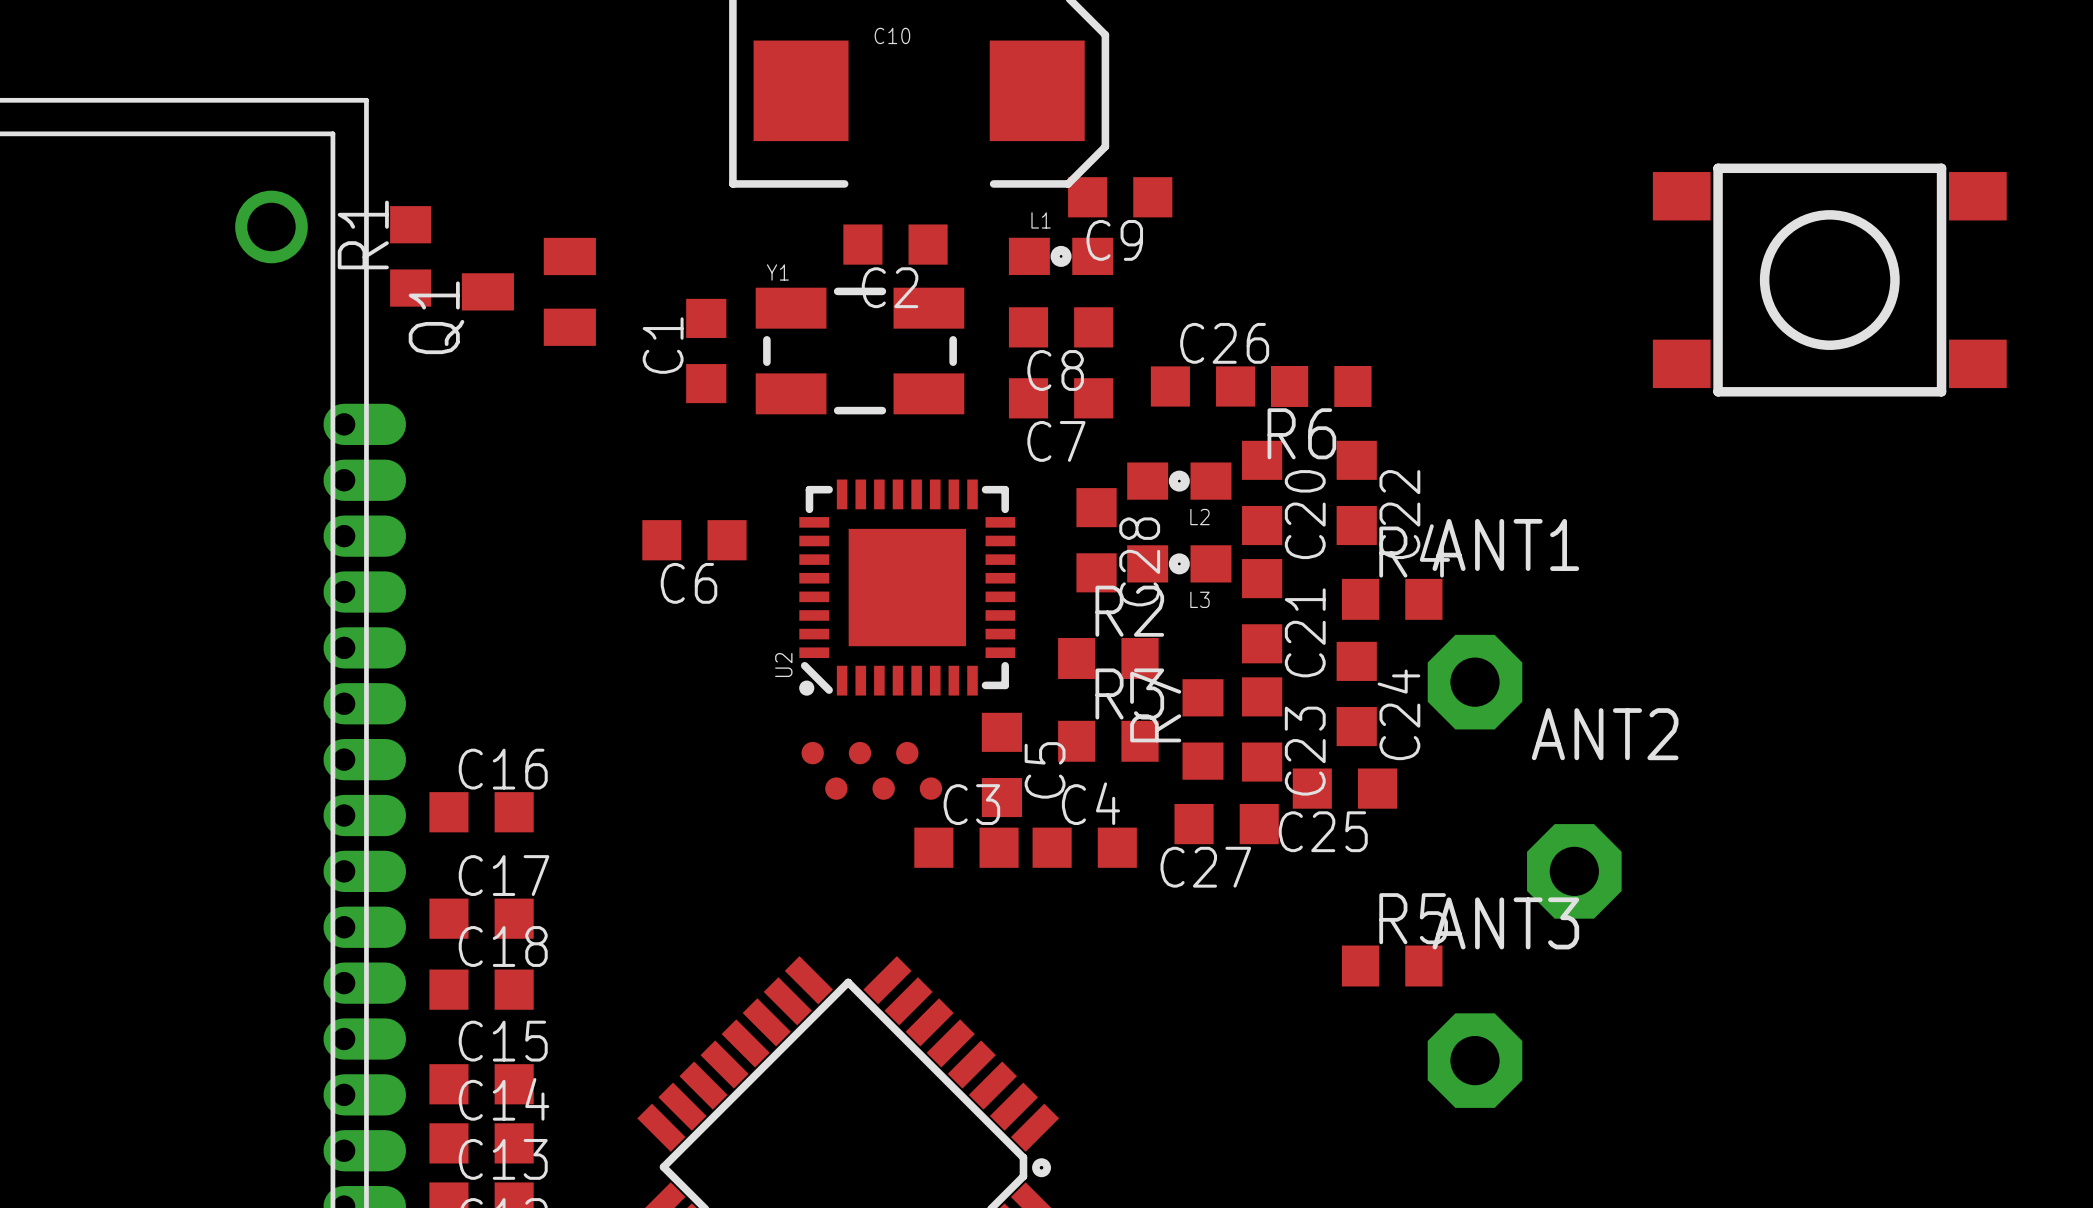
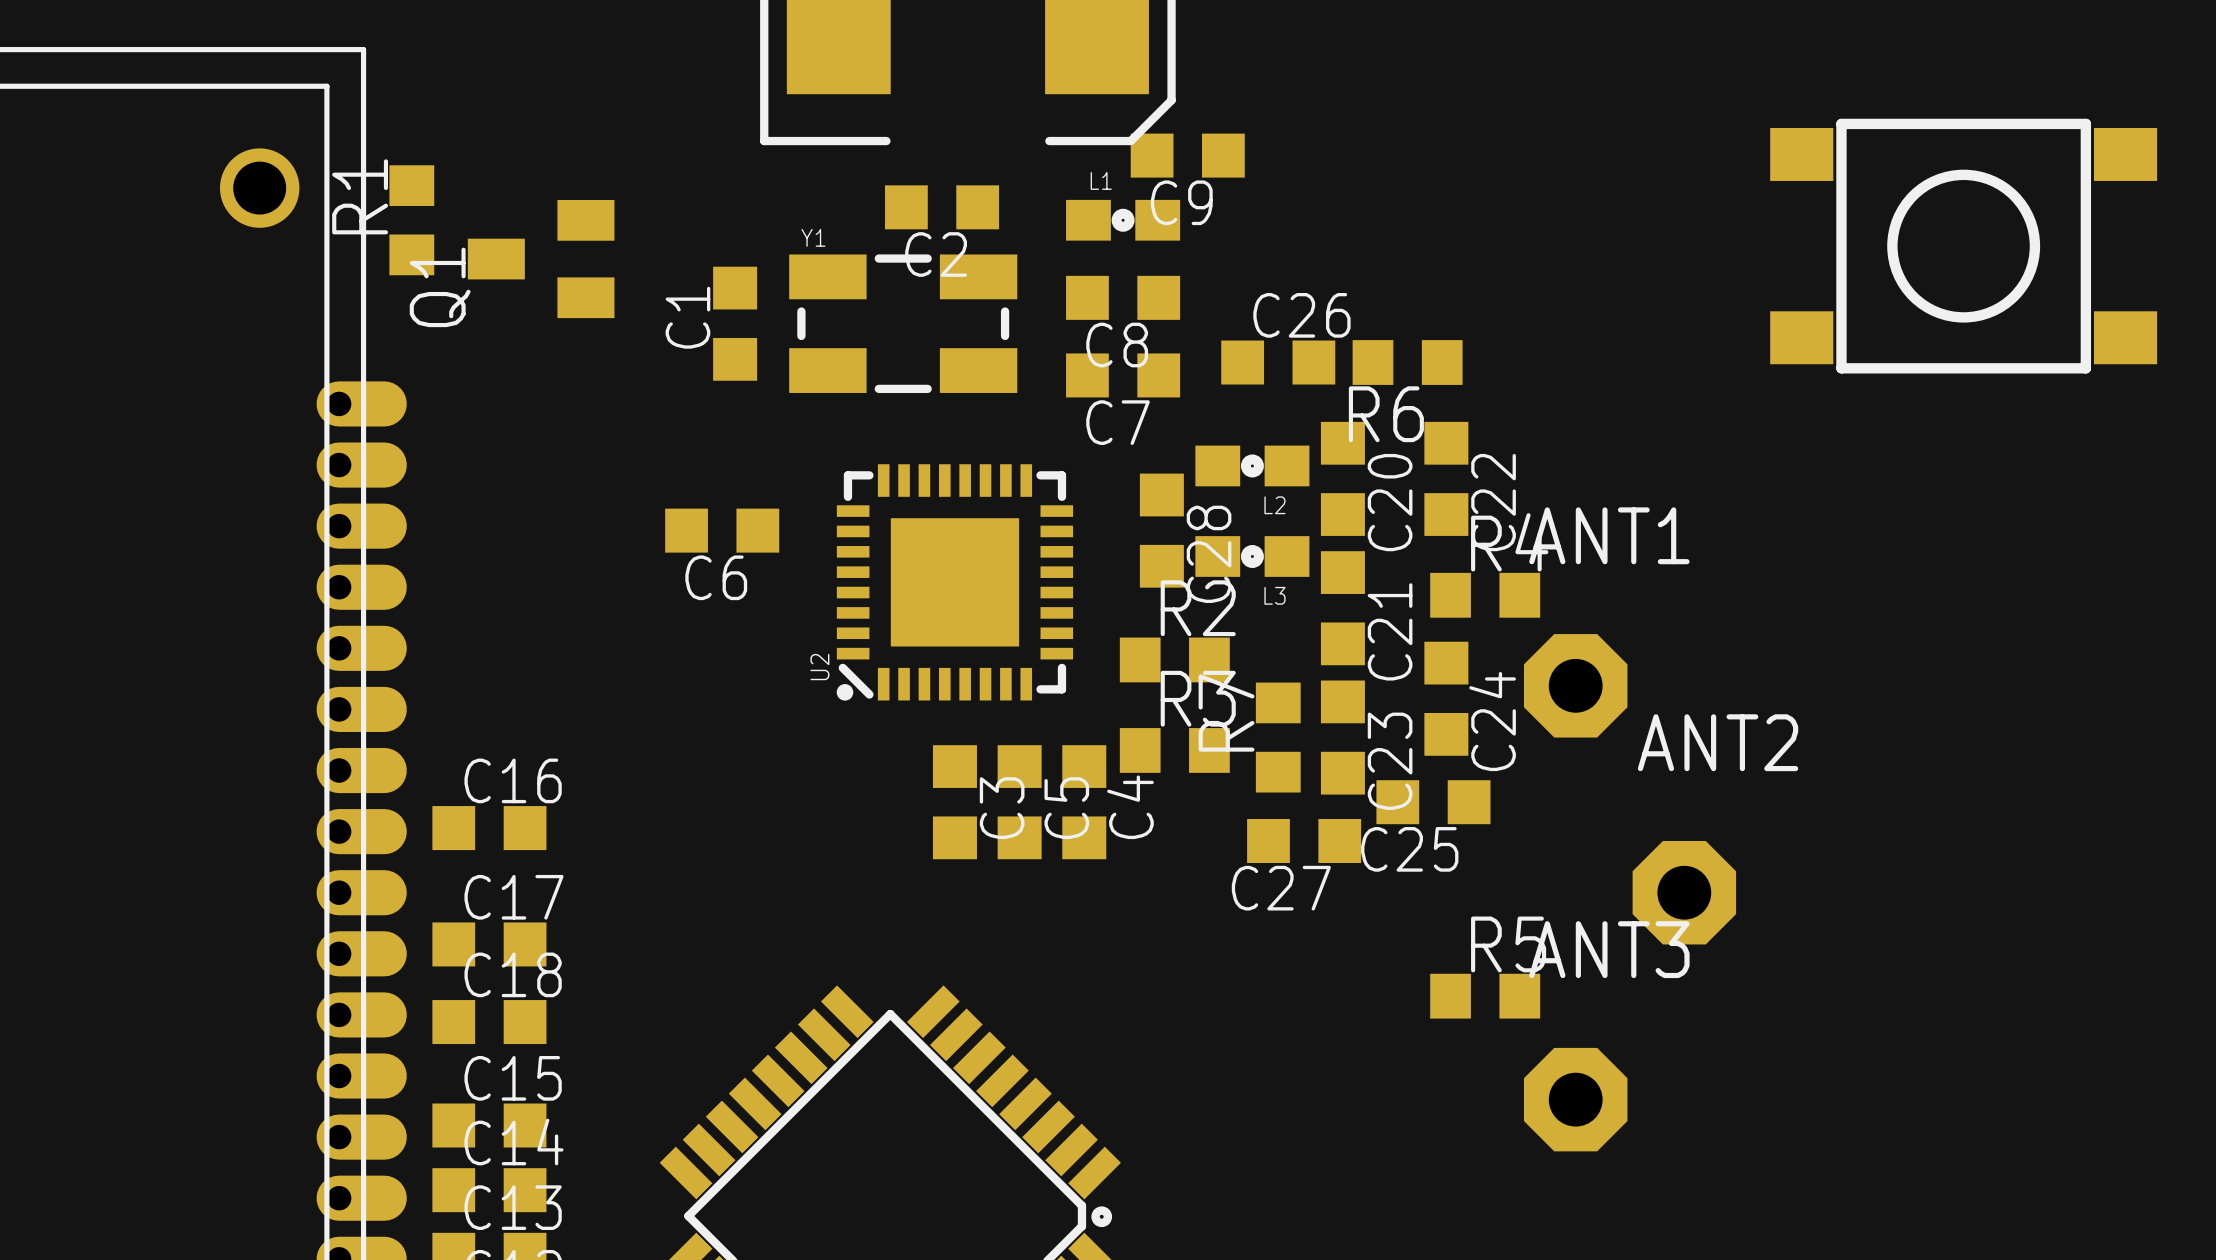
part: (812, 753) -> none
part: (860, 753) -> none
part: (907, 753) -> none
C5 position: (1001, 764) -> (1019, 802)
part: (836, 788) -> none
part: (883, 788) -> none
part: (930, 788) -> none
C3 rotation: 0° (966, 847) -> 90° clockwise (954, 802)
C3 position: (966, 847) -> (954, 802)
C4 rotation: 0° (1084, 847) -> 90° clockwise (1084, 802)
C4 position: (1084, 847) -> (1084, 802)

